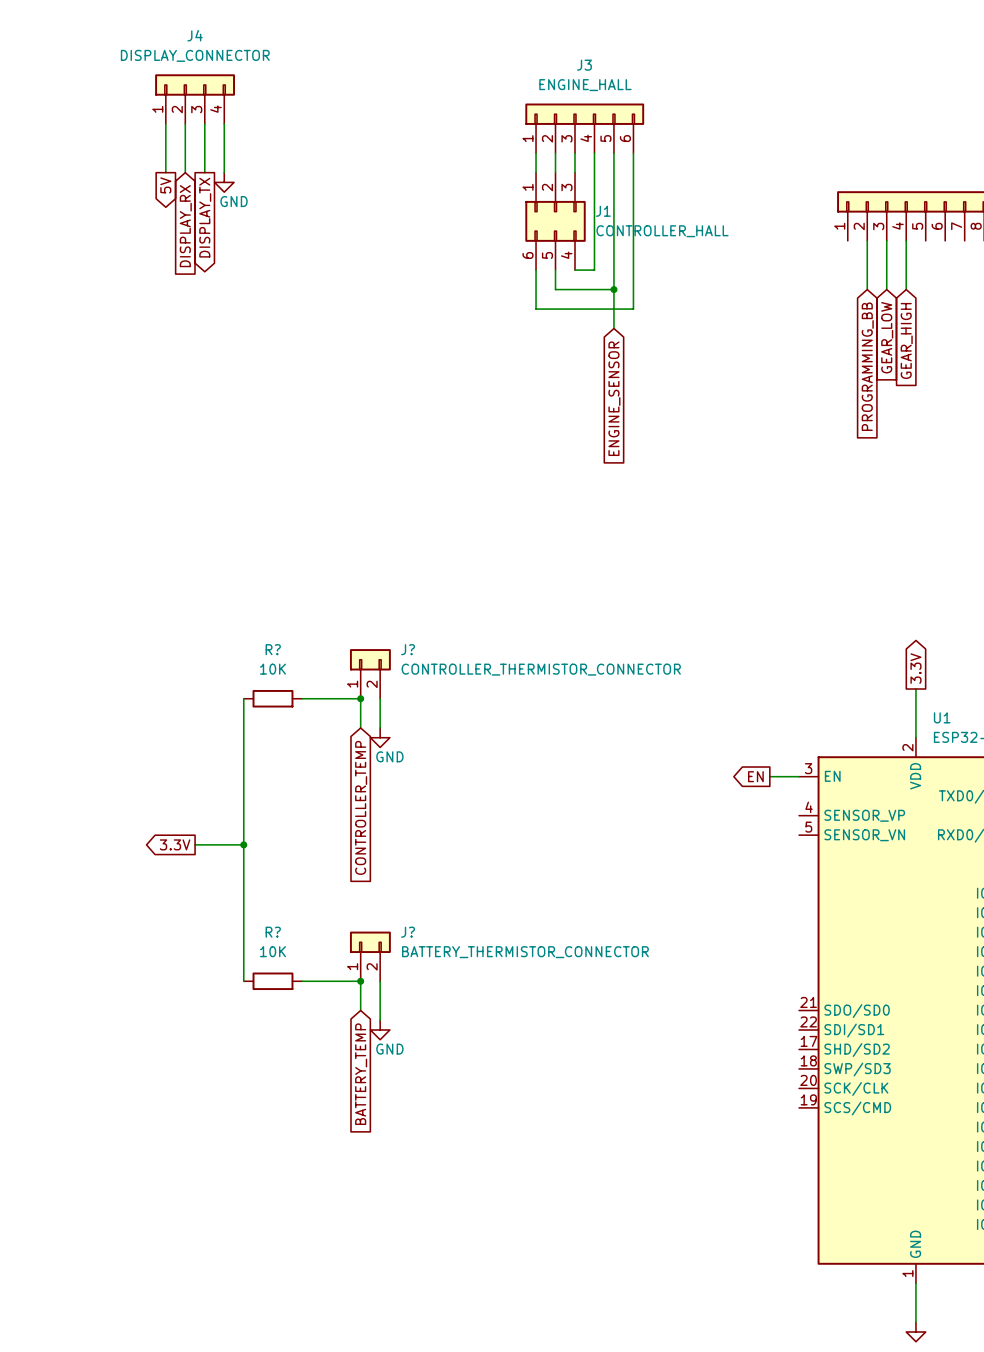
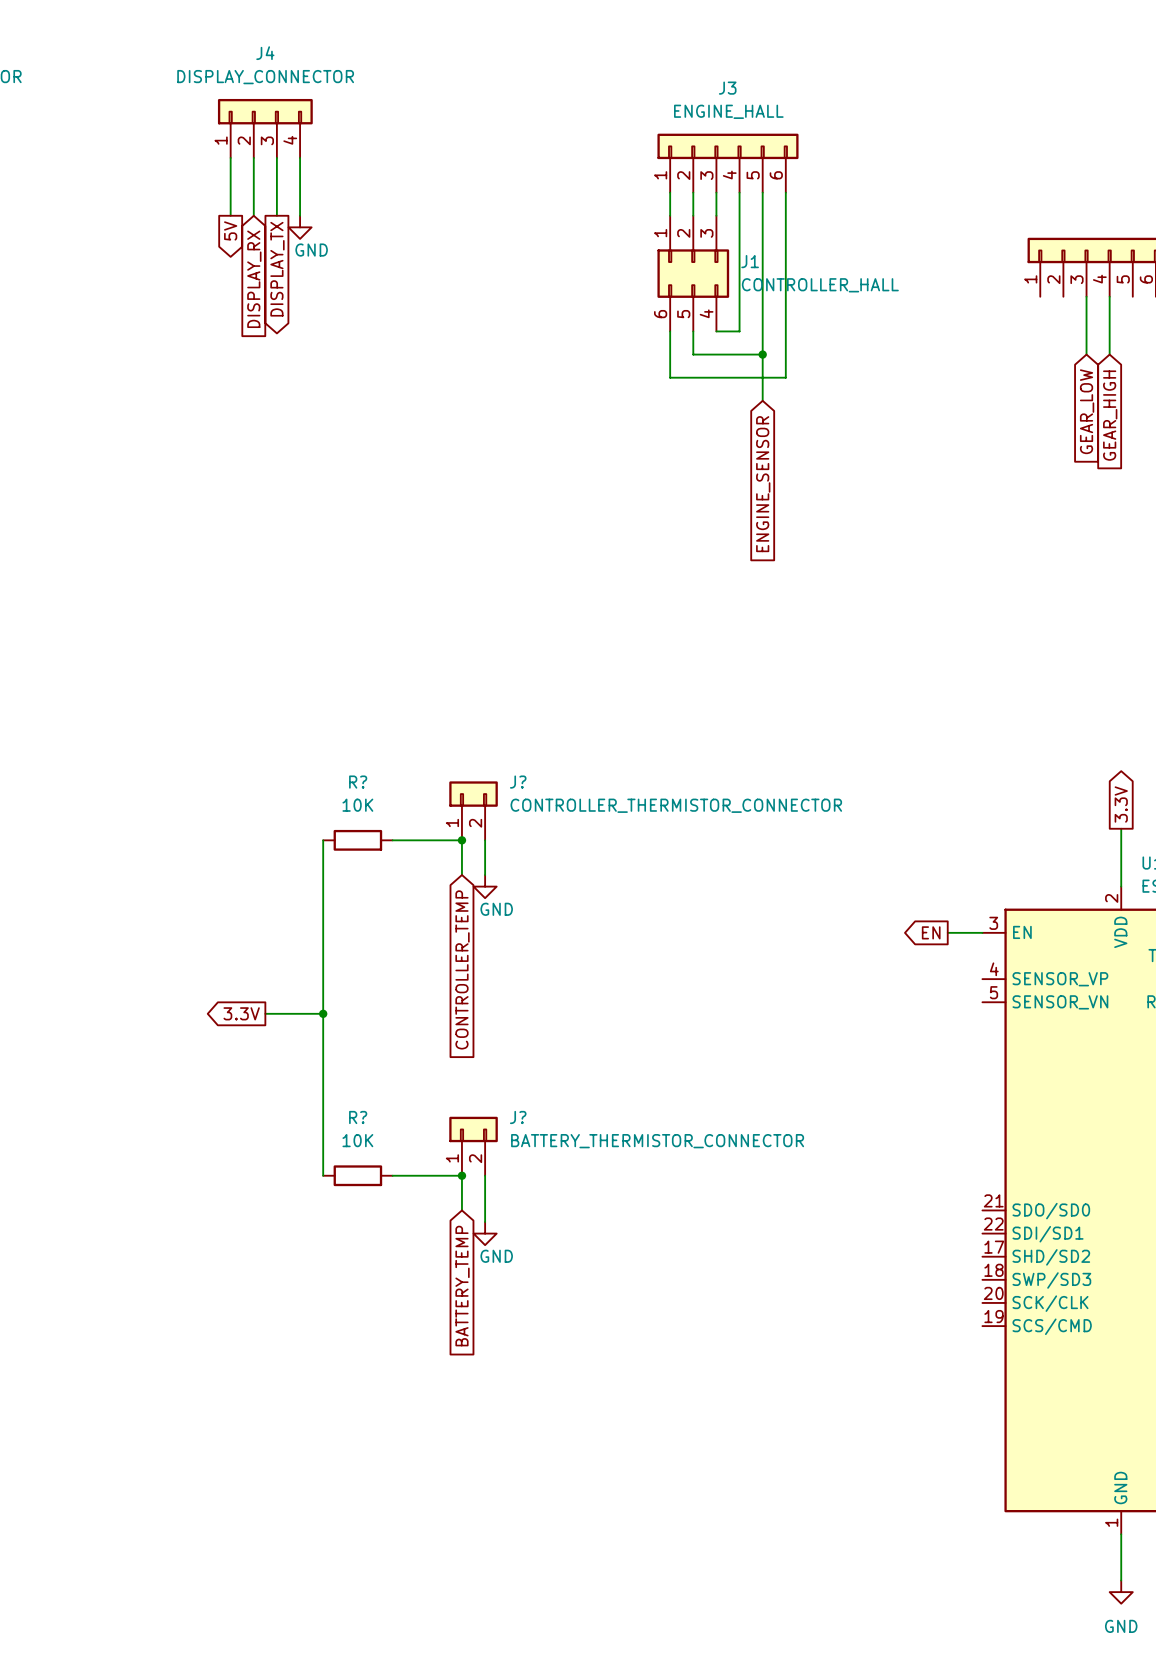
wire: (867, 240) (867, 289) -> none
global label: PROGRAMMING_BB (867, 366) -> none

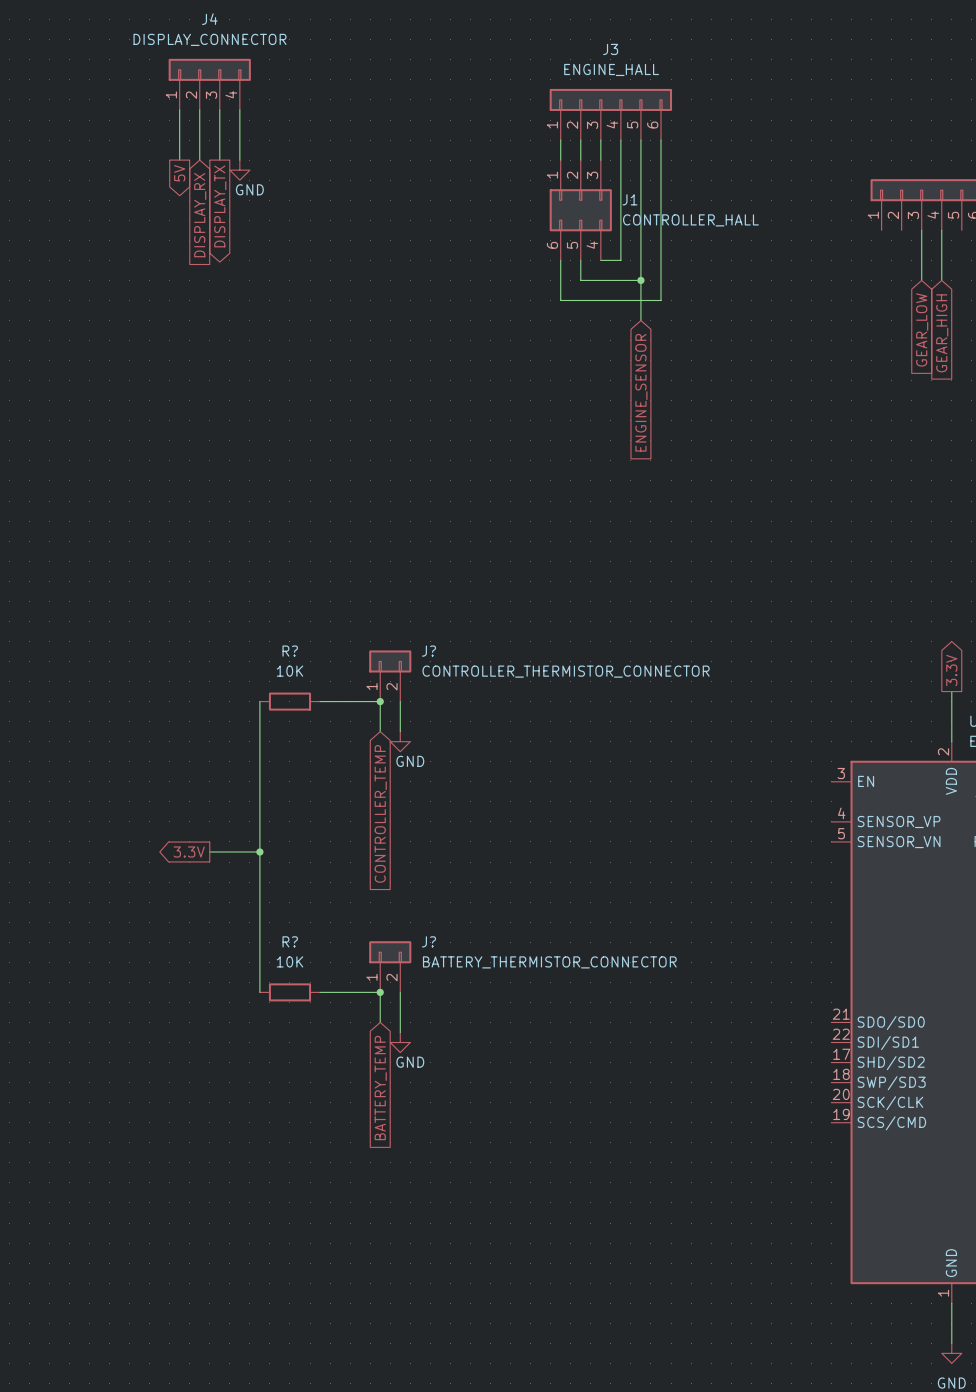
global label: EN (931, 932) -> none
wire: (947, 932) (982, 932) -> none

